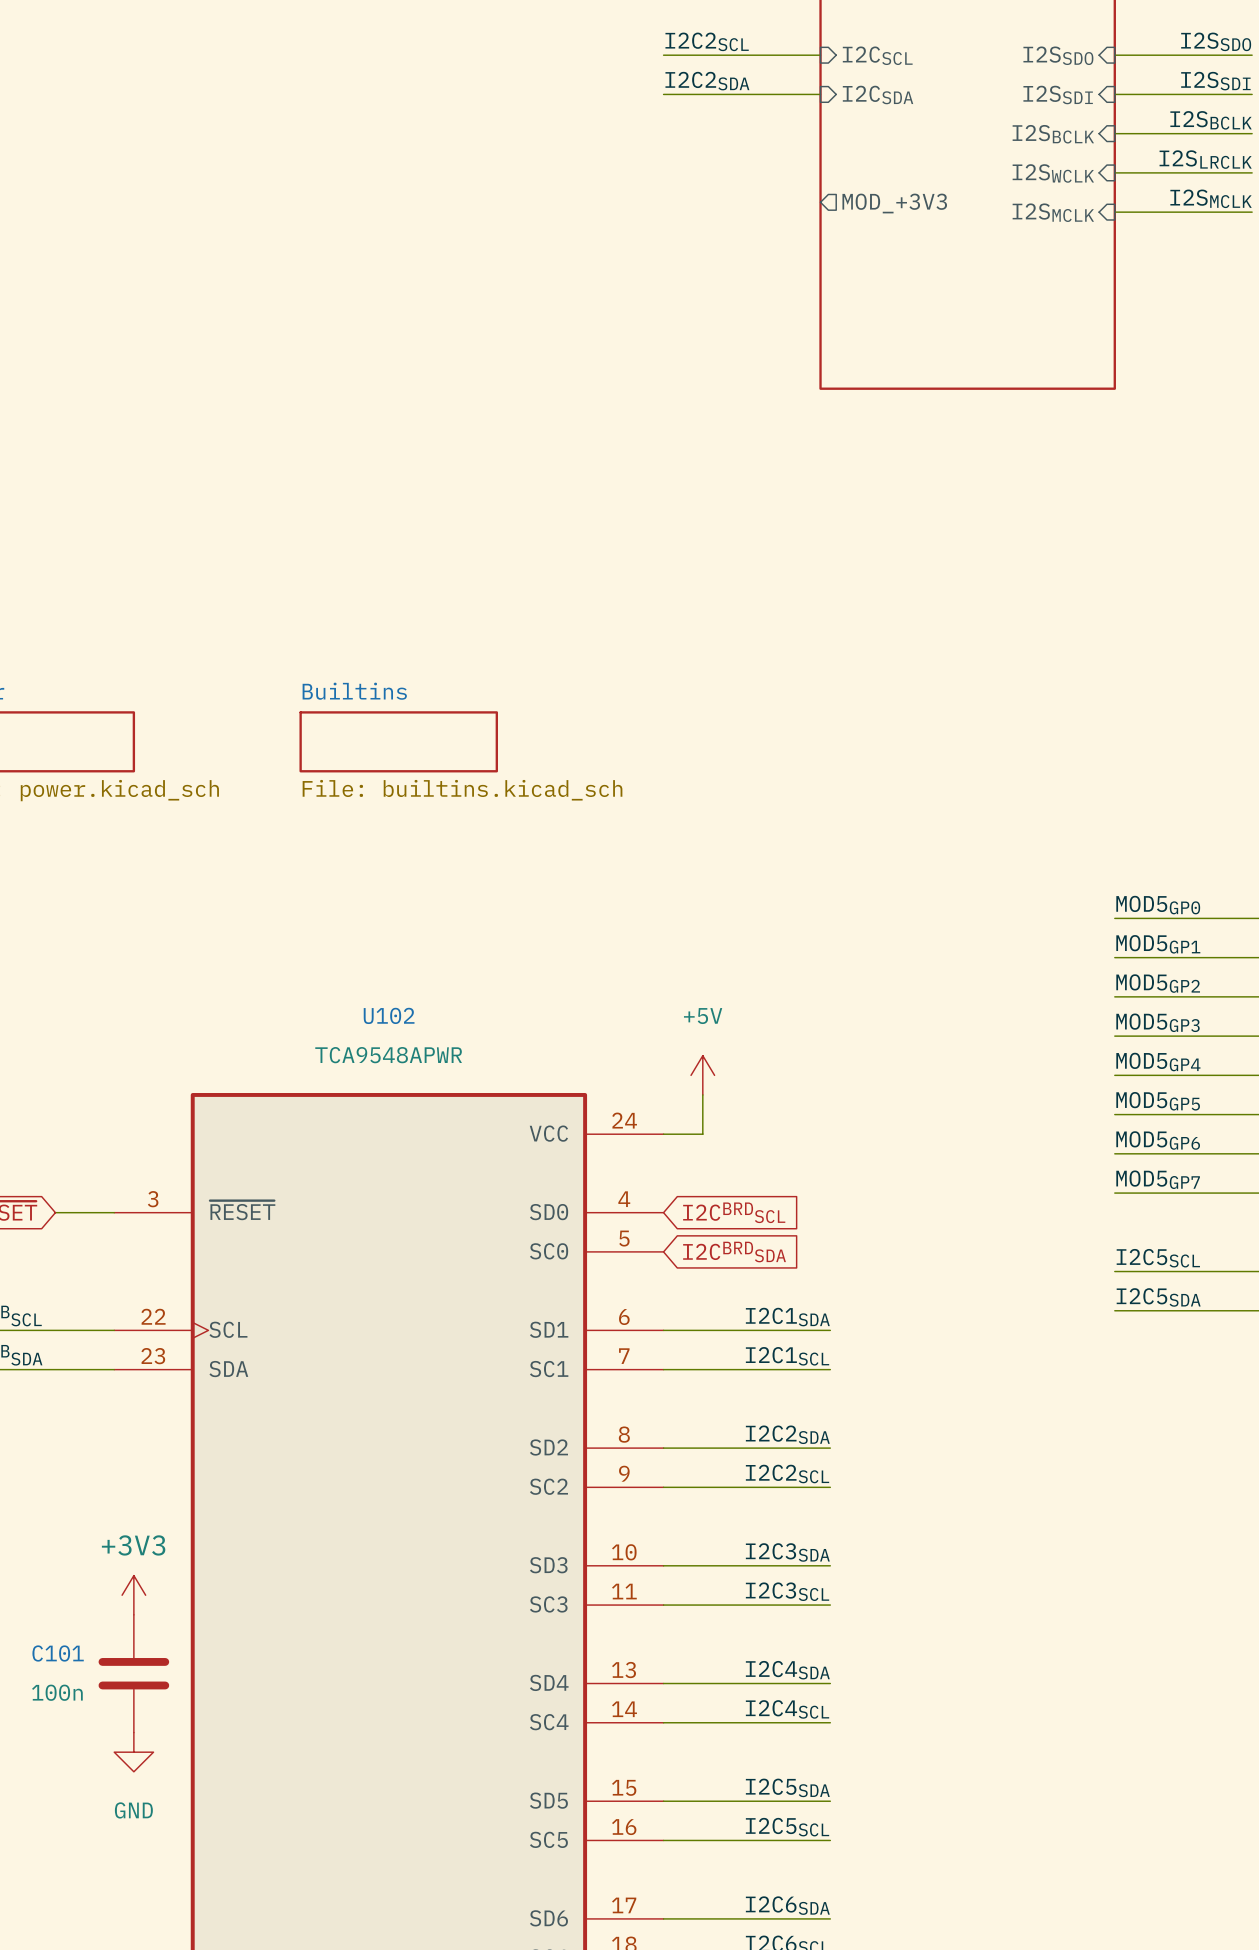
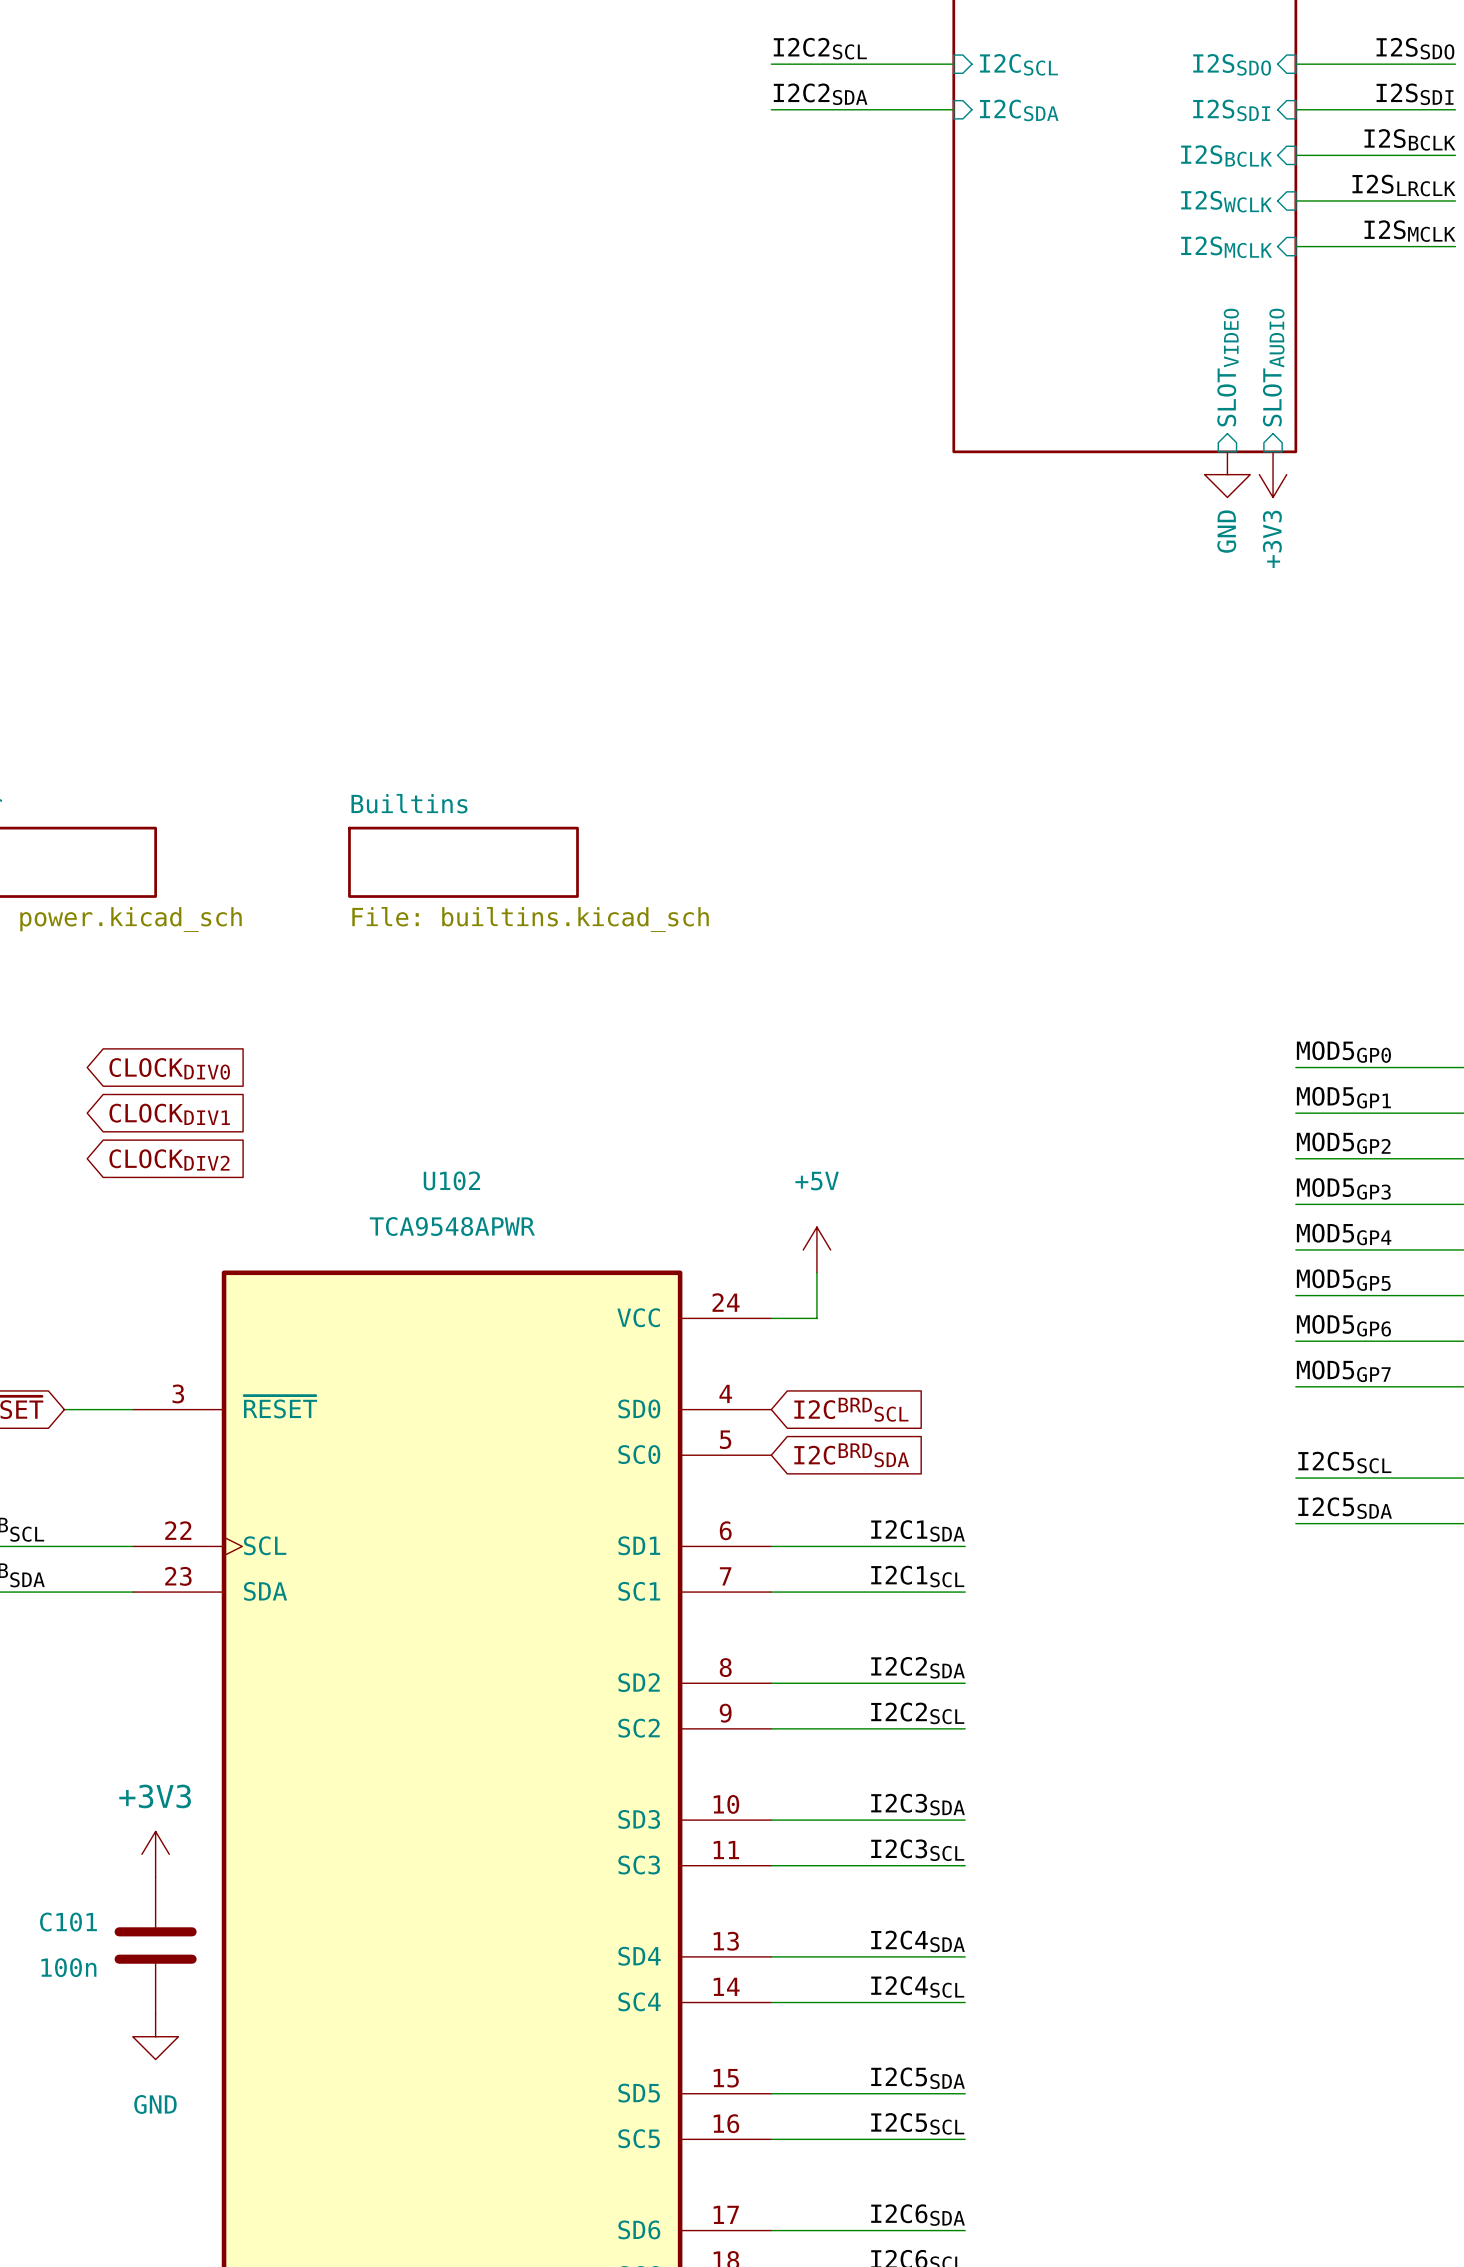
sheet pin: MOD_+3V3 (894, 203) -> none
sheet pin: none -> SLOTVIDEO (1228, 367)
sheet pin: none -> SLOTAUDIO (1273, 367)
power symbol: none -> GND (1227, 474)
power symbol: none -> +3V3 (1273, 474)
global label: none -> CLOCKDIV0 (169, 1068)
global label: none -> CLOCKDIV1 (169, 1114)
global label: none -> CLOCKDIV2 (169, 1159)

